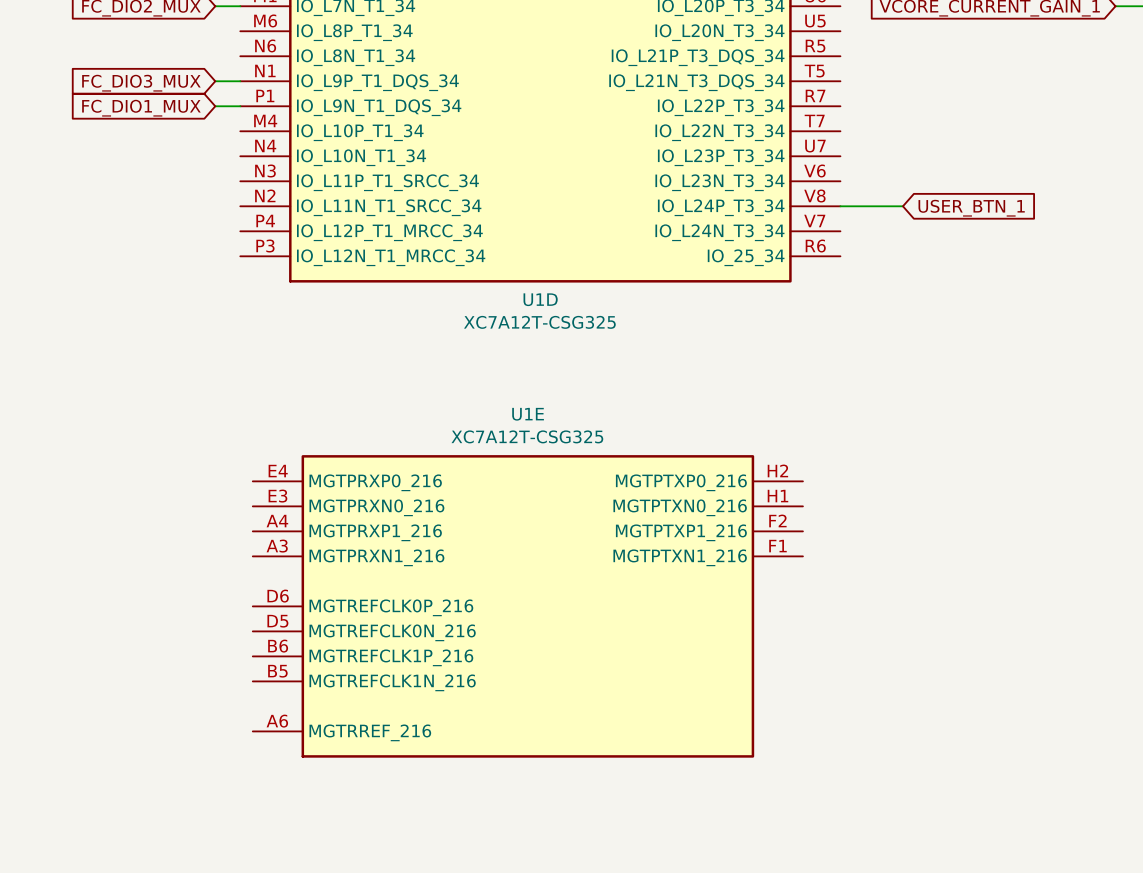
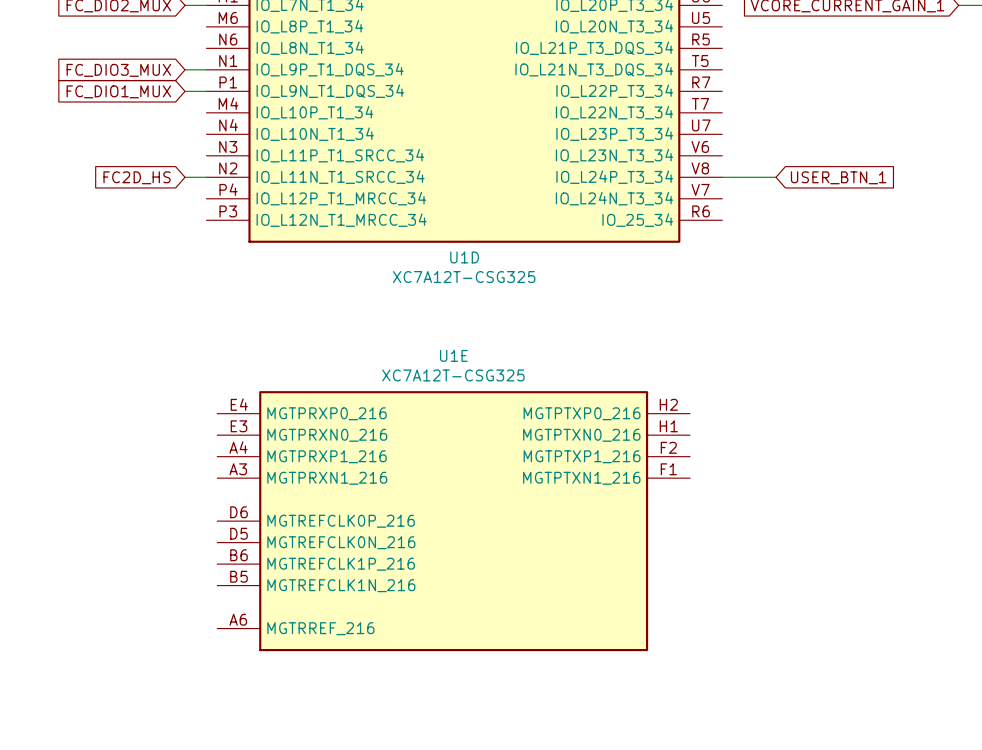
wire: none -> (185, 177) (206, 177)
global label: none -> FC2D_HS (137, 177)

